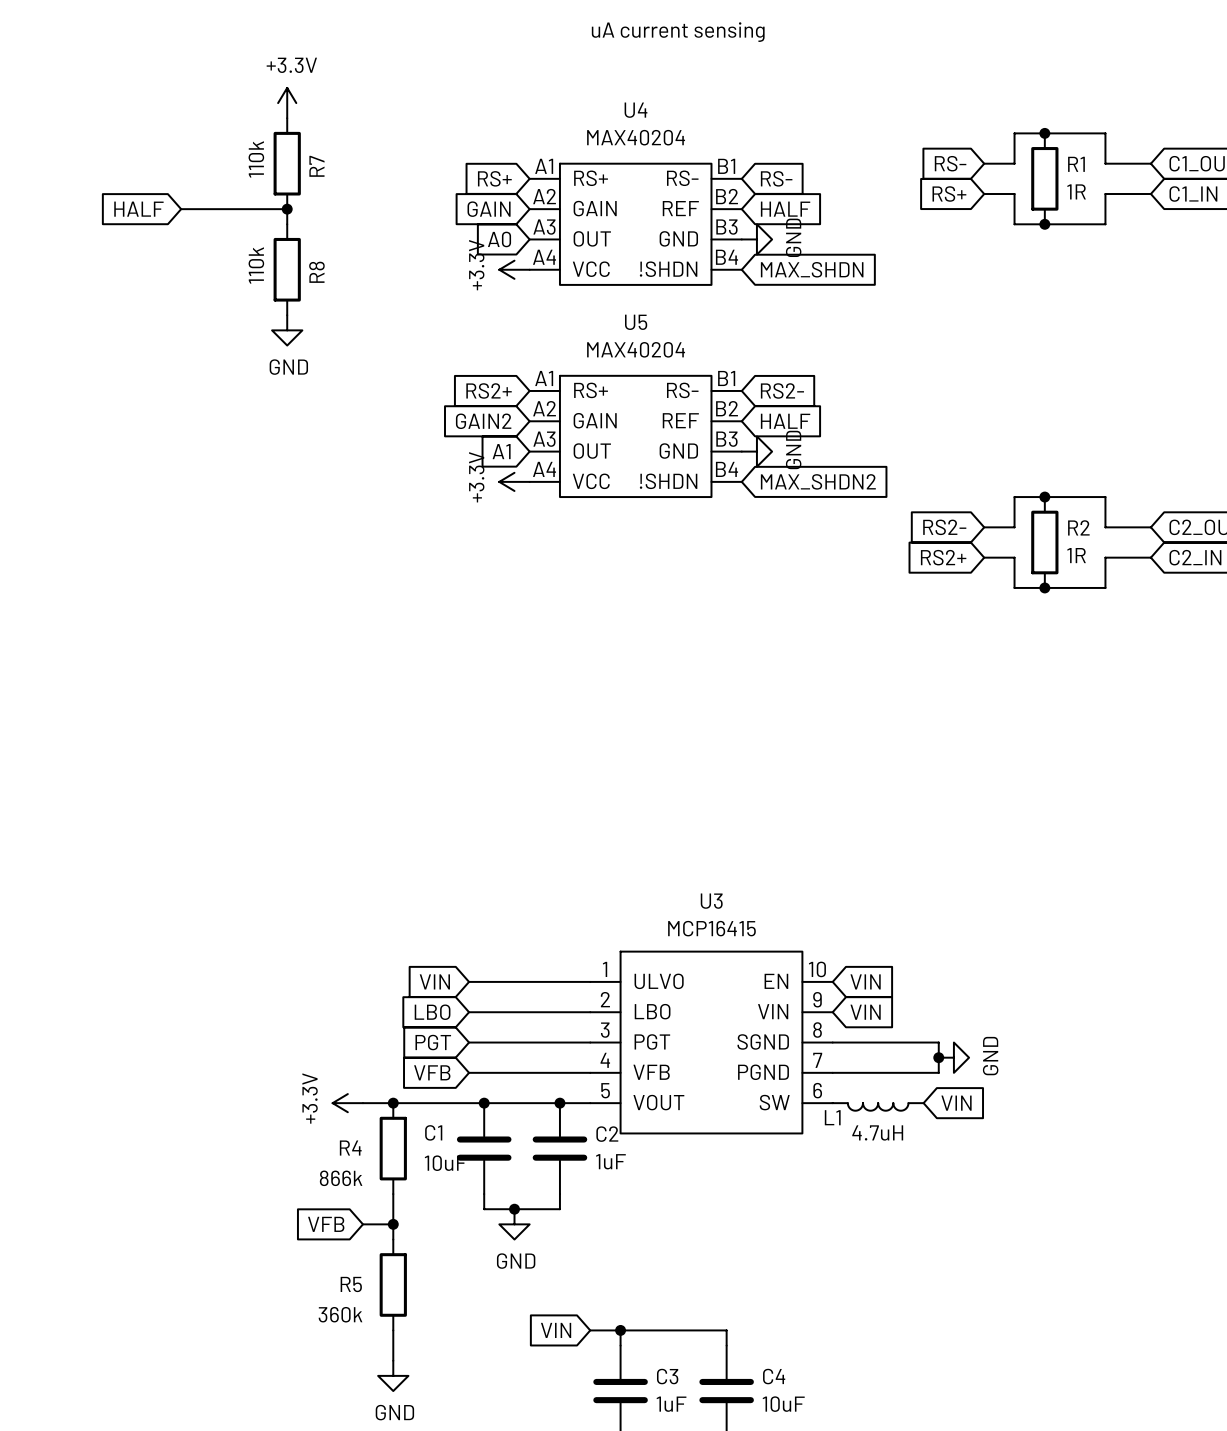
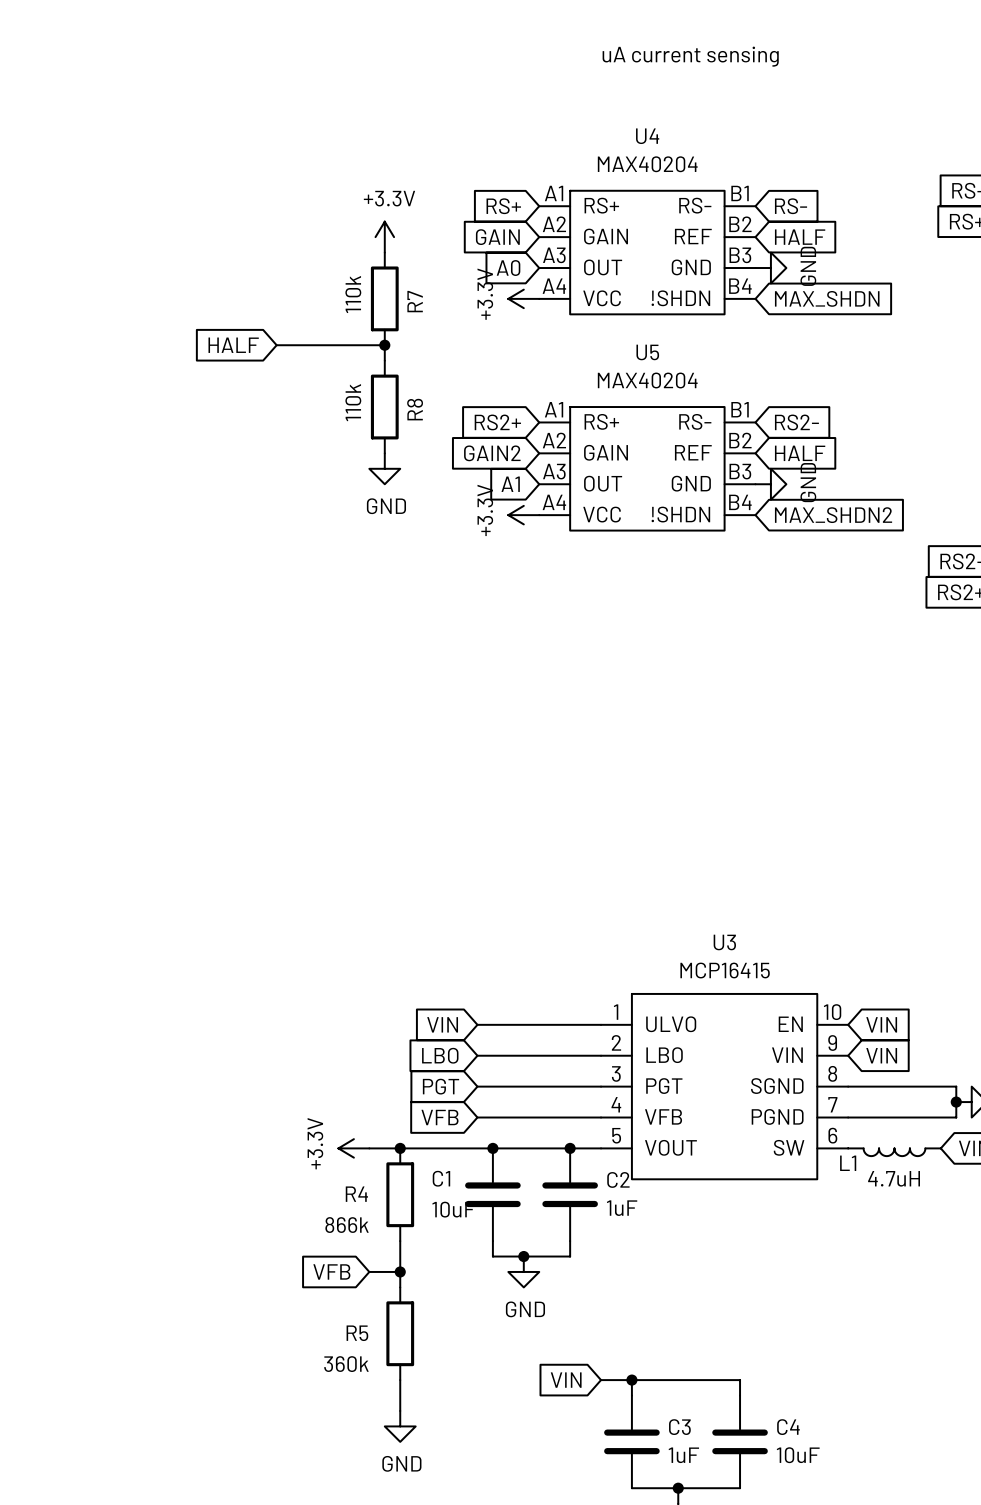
power symbol position: +3.3V (287, 103) -> +3.3V (384, 237)
R7 position: (287, 163) -> (384, 298)
global label position: HALF (138, 209) -> HALF (233, 345)
wire: (181, 209) (287, 209) (287, 224) -> (276, 345) (384, 345) (384, 360)
junction: (287, 209) -> none
R8 position: (287, 269) -> (384, 407)
junction: none -> (384, 345)
power symbol position: GND (287, 330) -> GND (384, 468)

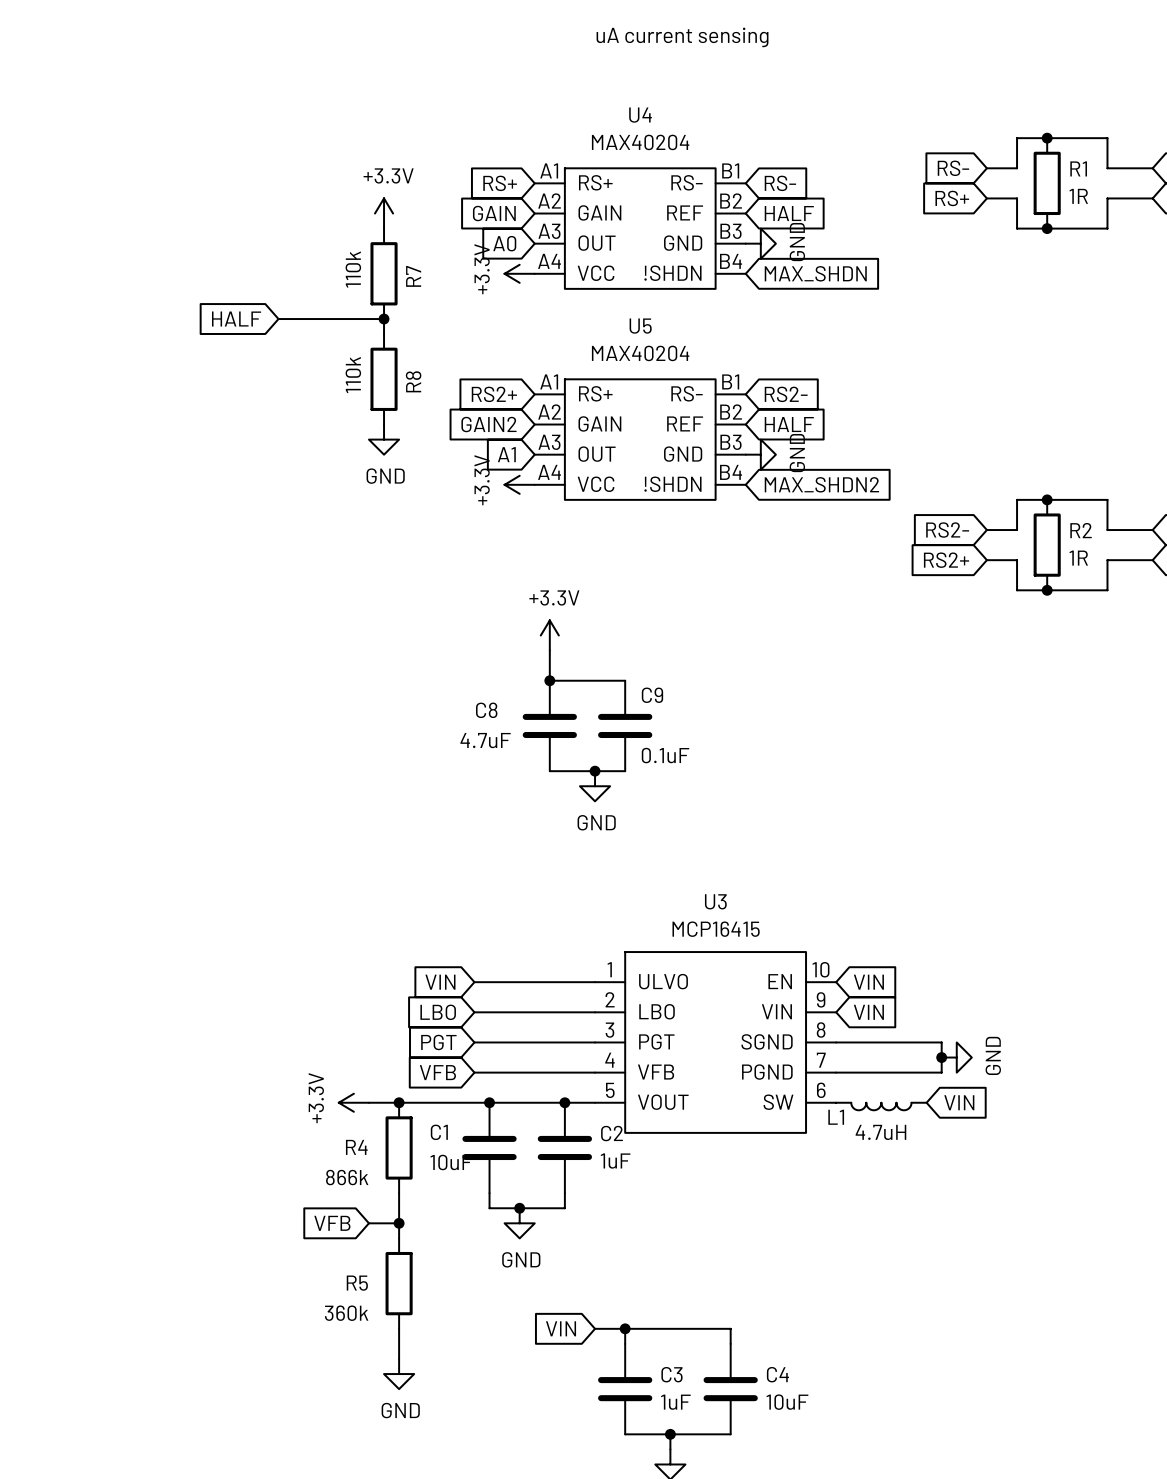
power symbol: none -> +3.3V (549, 635)
wire: none -> (549, 650) (549, 680) (625, 680)
junction: none -> (549, 680)
C8: none -> 4.7uF (549, 725)
C9: none -> 0.1uF (625, 725)
wire: none -> (549, 771) (625, 771)
junction: none -> (595, 771)
power symbol: none -> GND (595, 786)

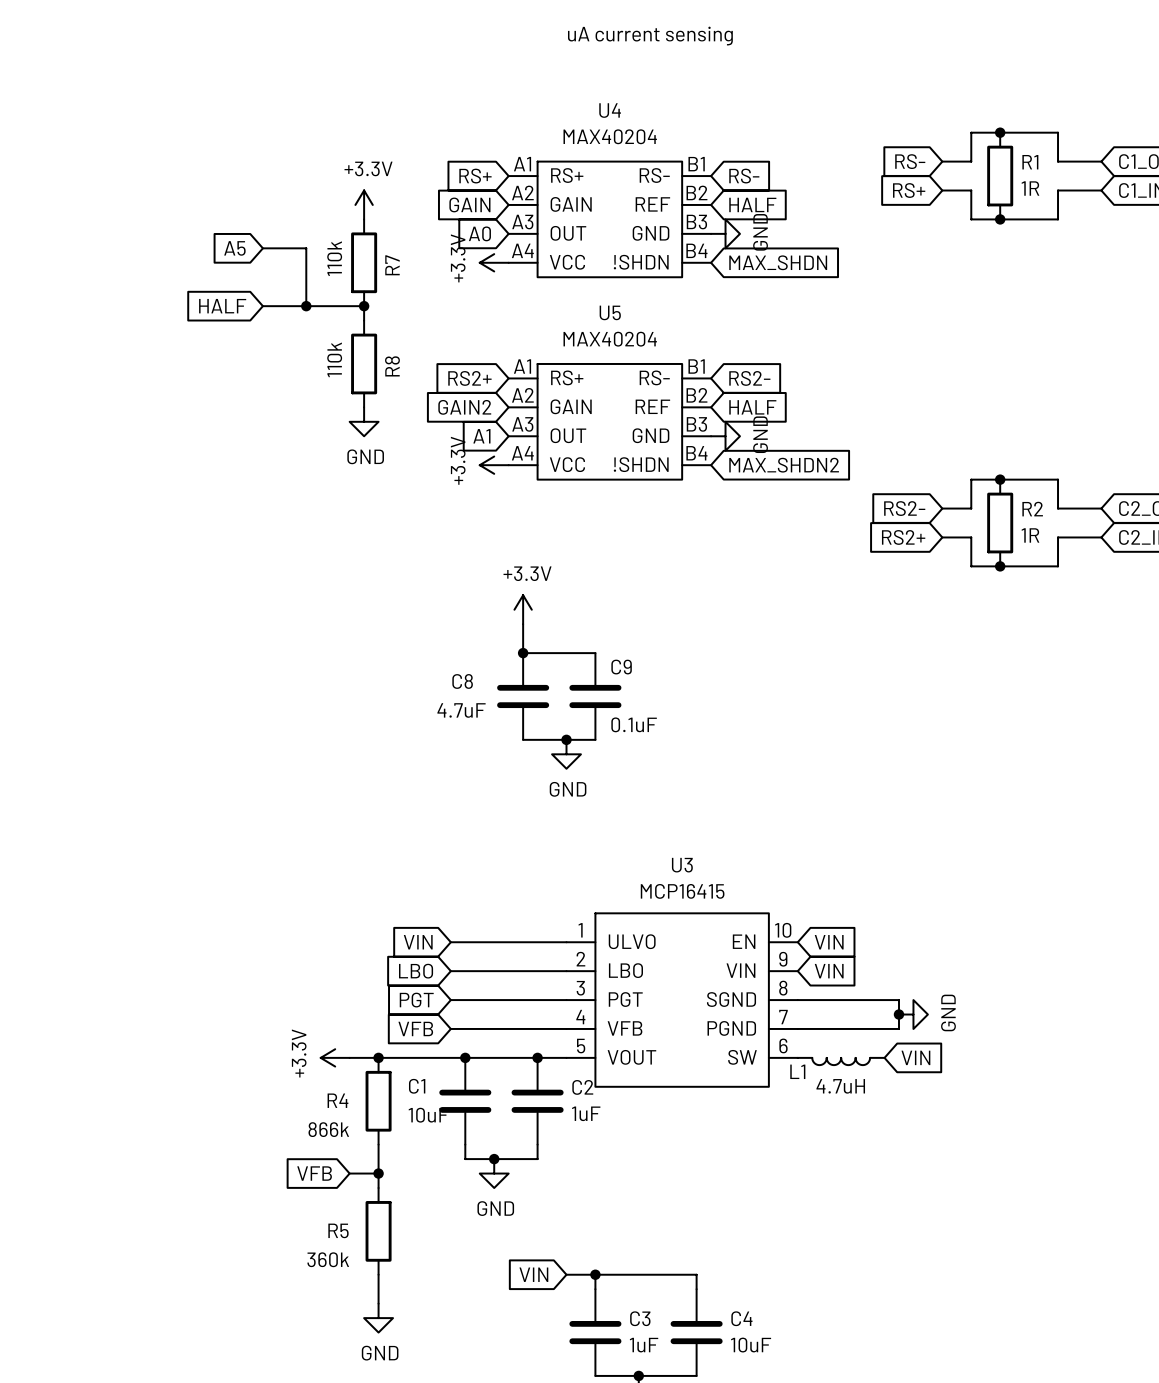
global label: none -> A5 (234, 248)
wire: none -> (262, 248) (306, 248) (306, 306)
junction: none -> (306, 306)

